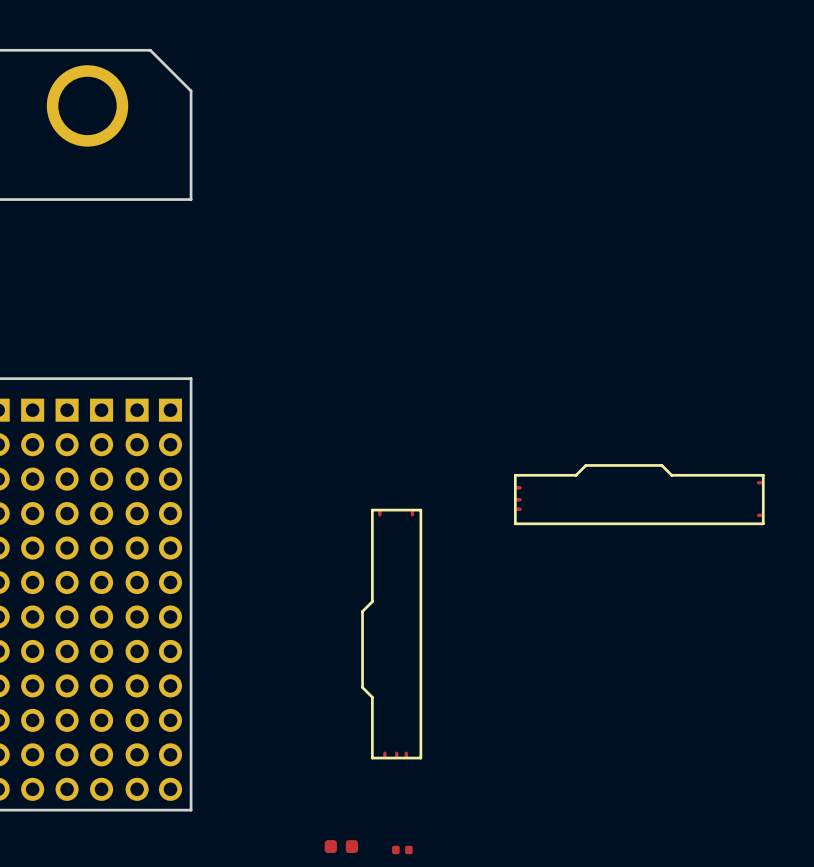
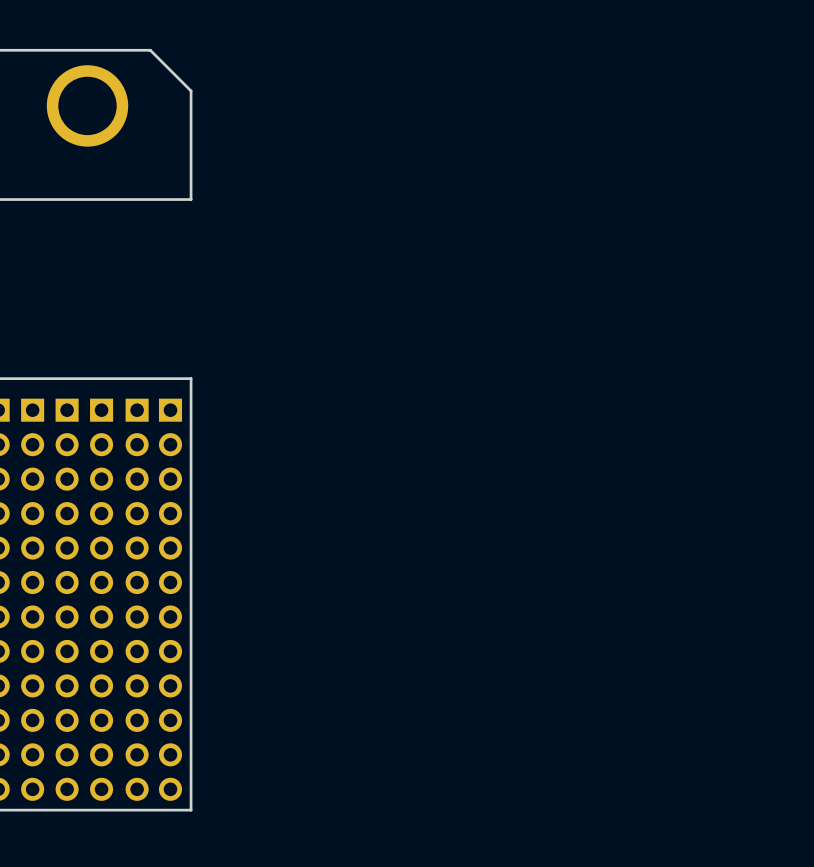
part: (639, 494) -> none
part: (391, 634) -> none
part: (341, 846) -> none
part: (402, 849) -> none

